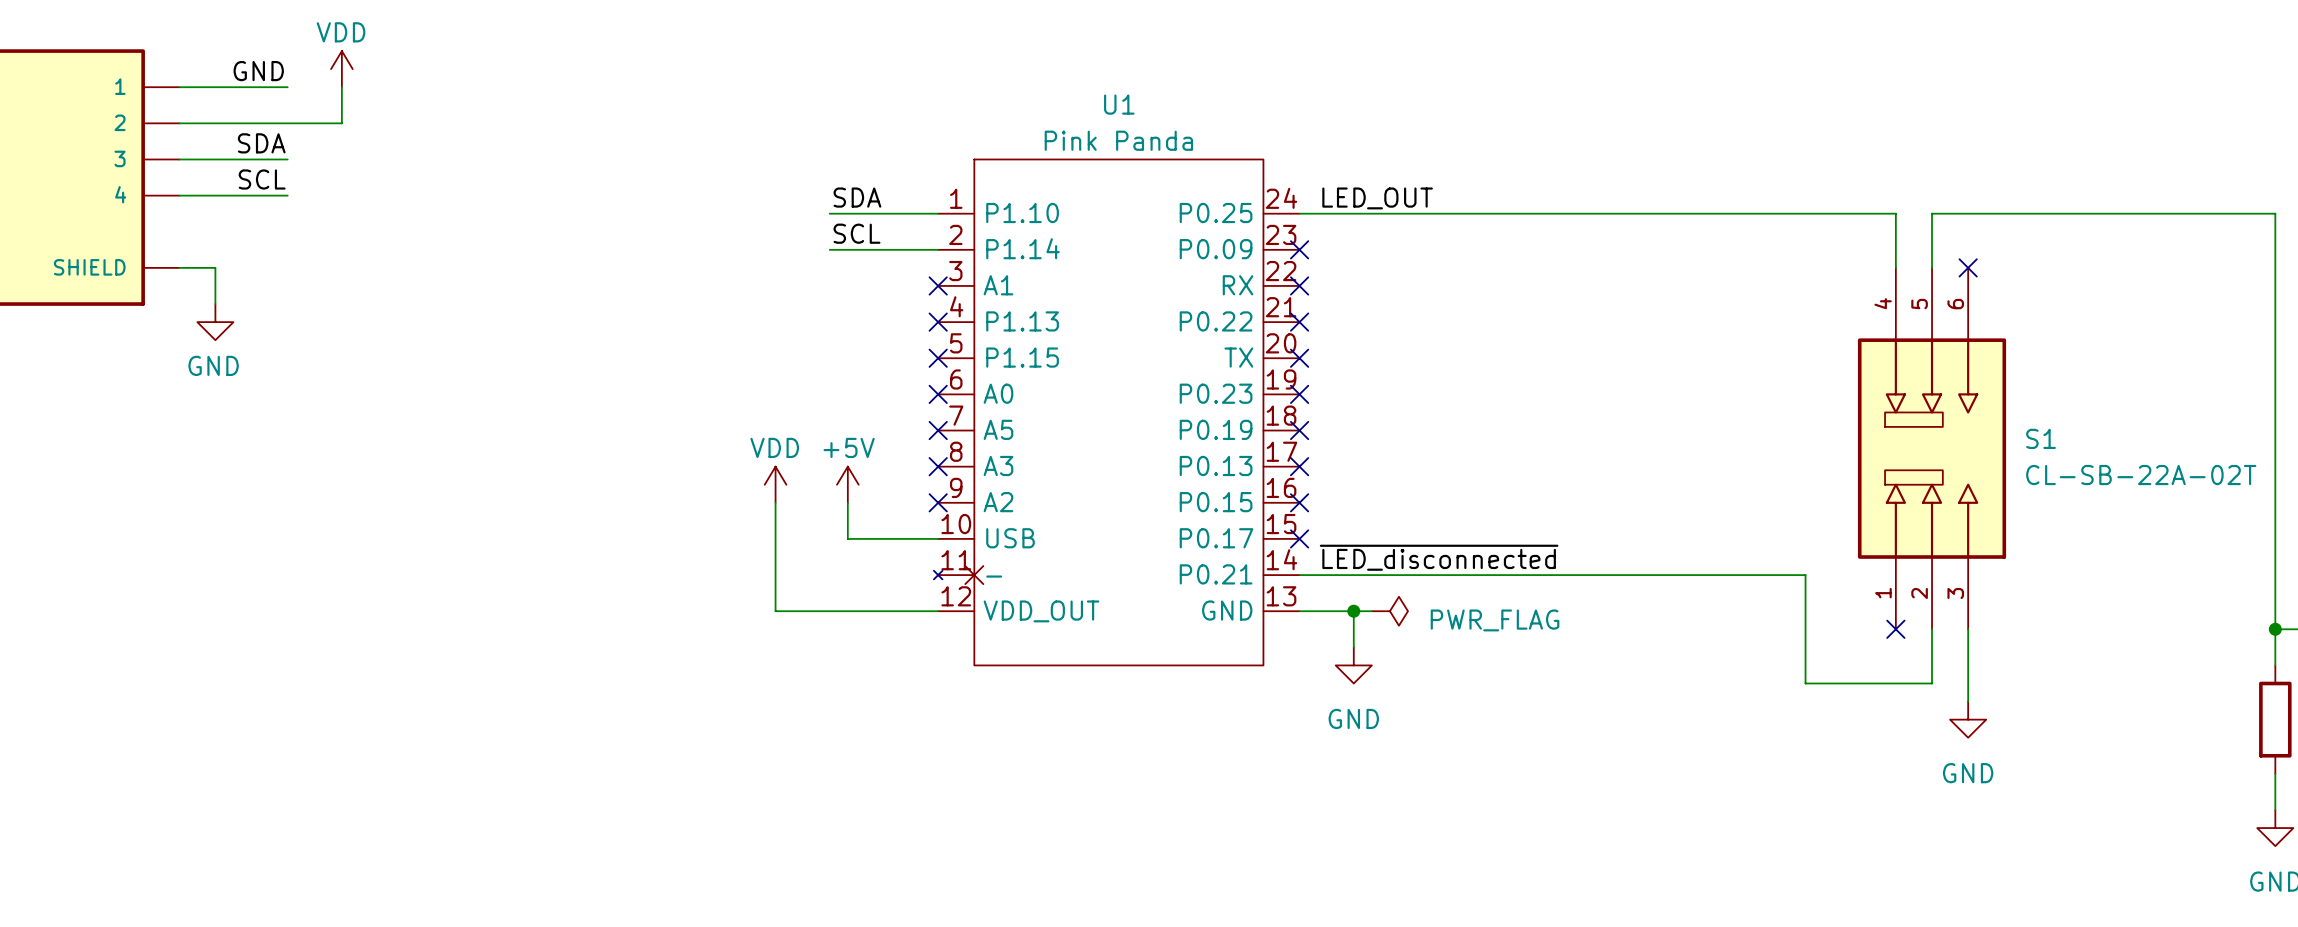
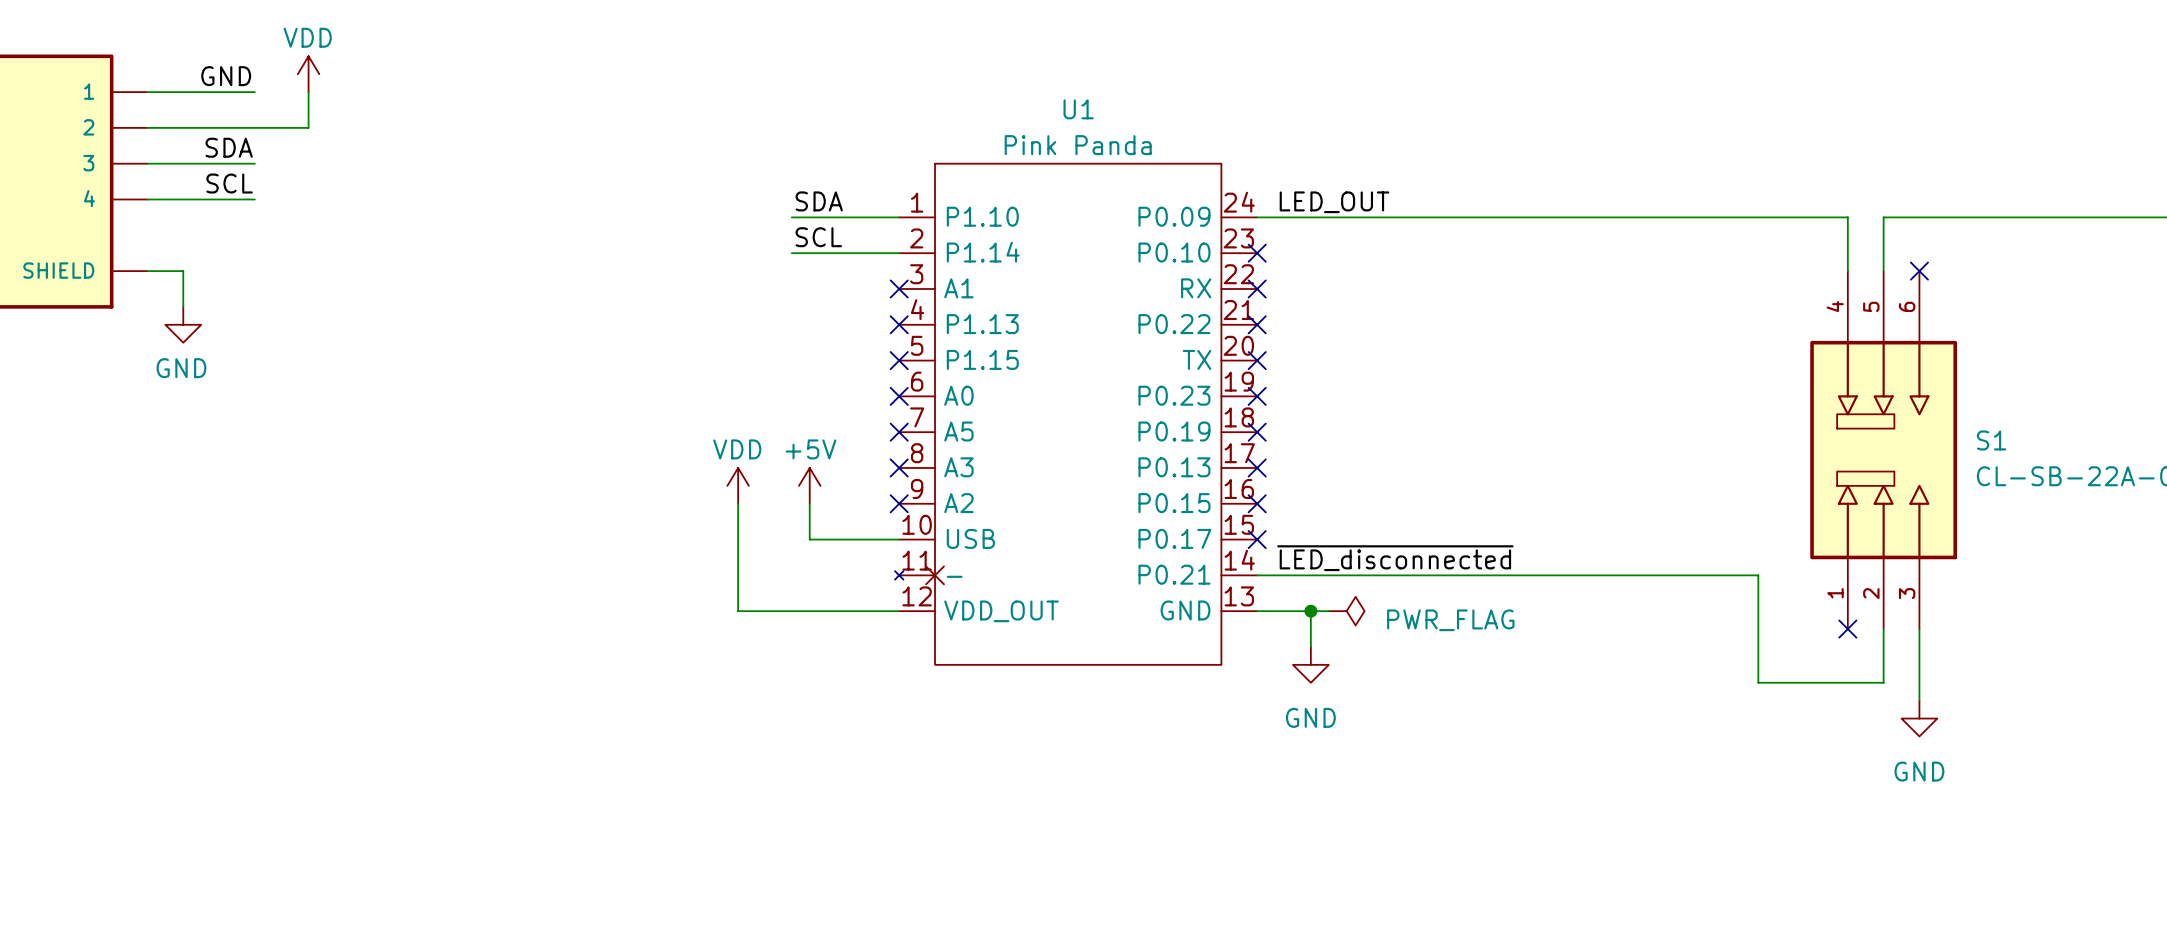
U1 pin name: P0.25 (1216, 213) -> P0.09 (1174, 216)
U1 pin name: P0.09 (1216, 249) -> P0.10 (1174, 252)

